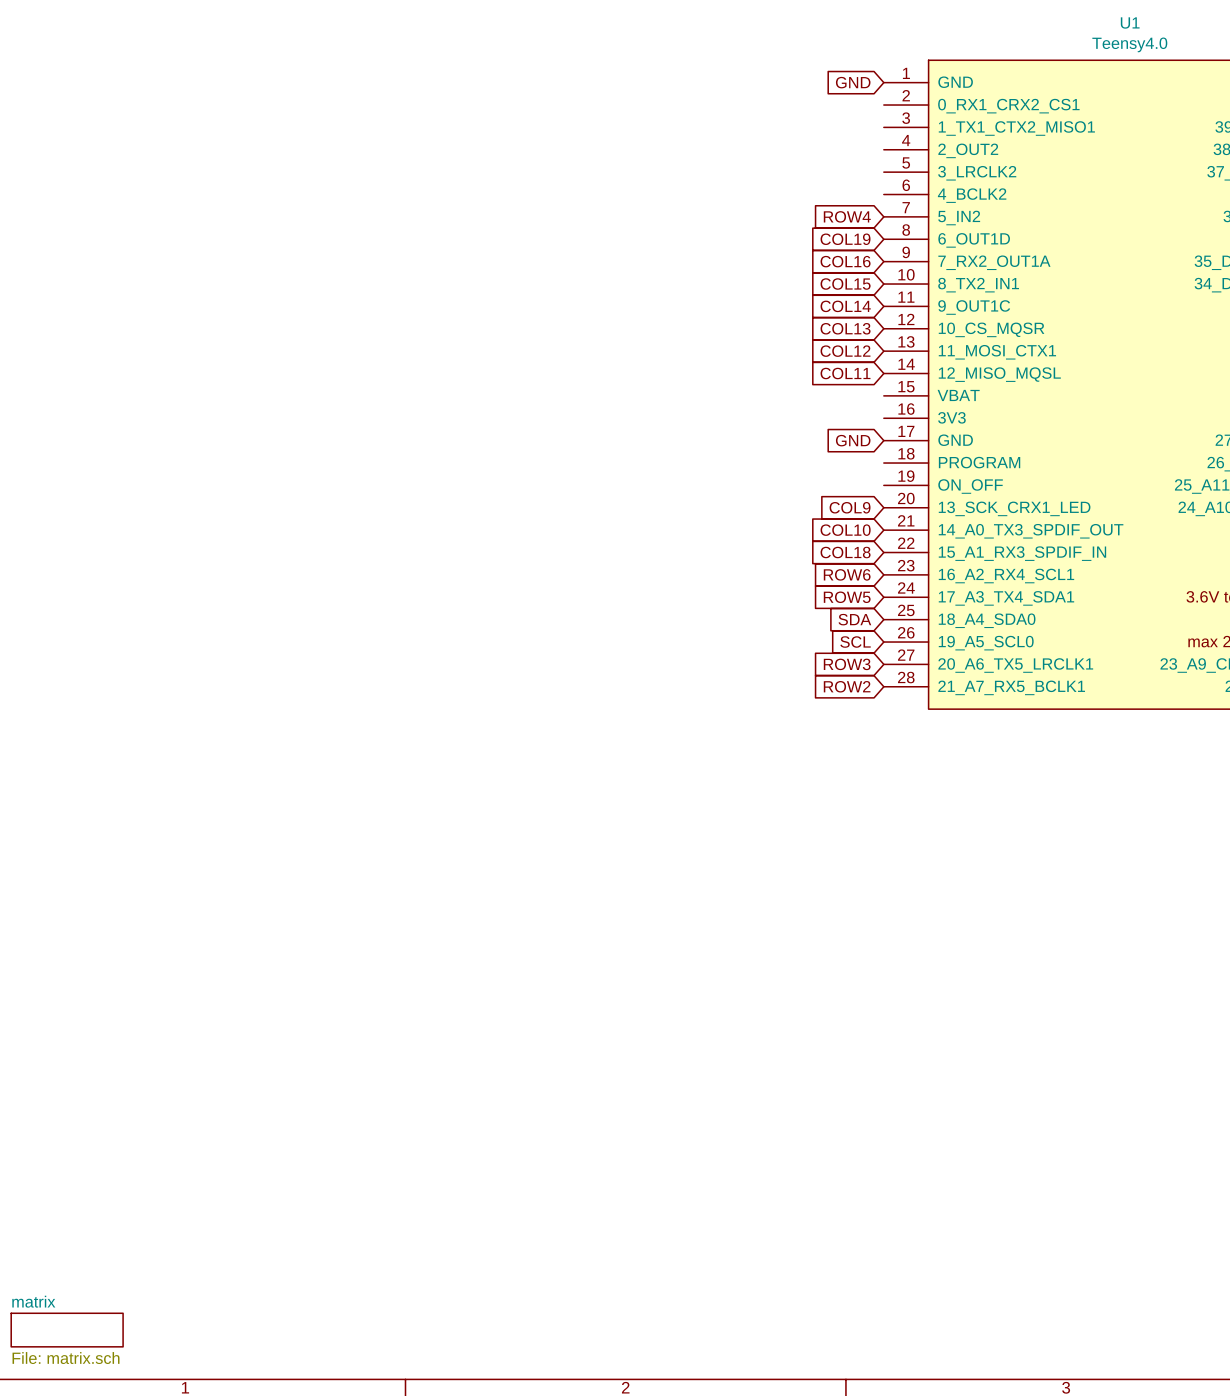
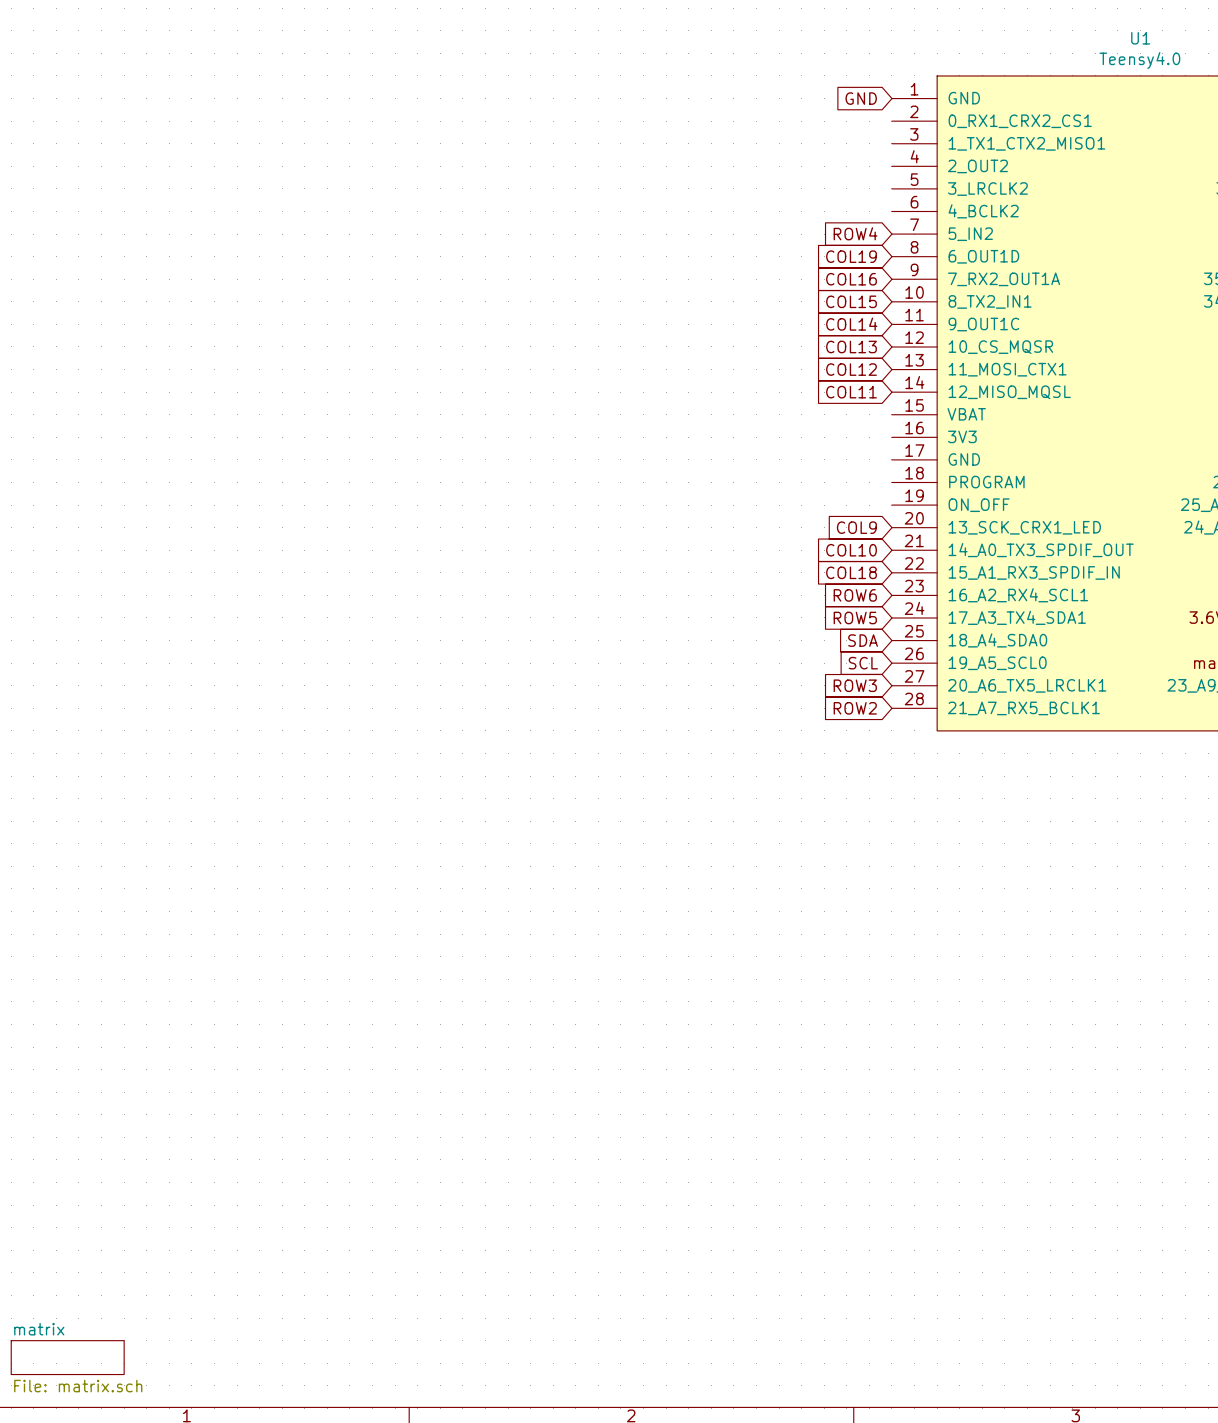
global label: GND (853, 440) -> none

